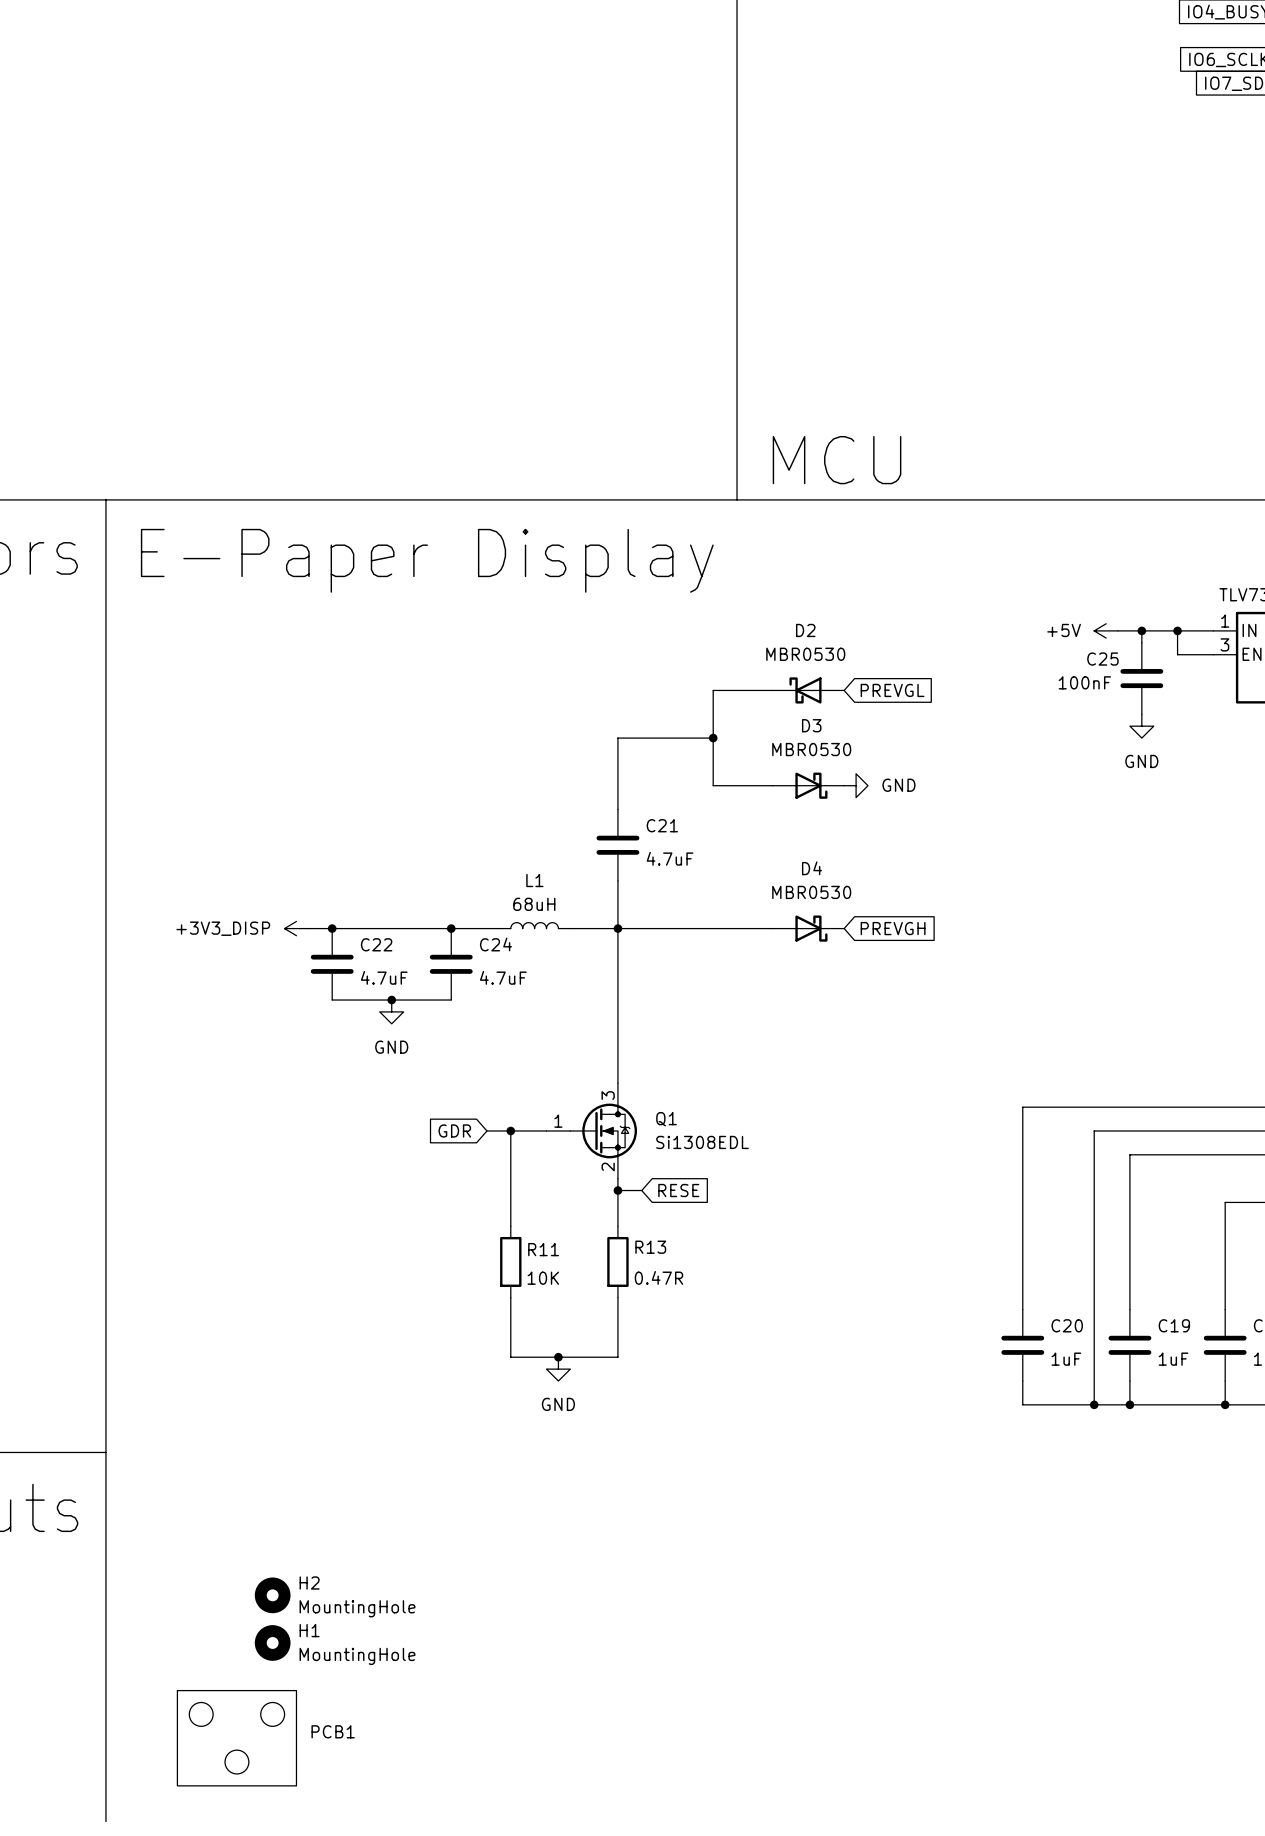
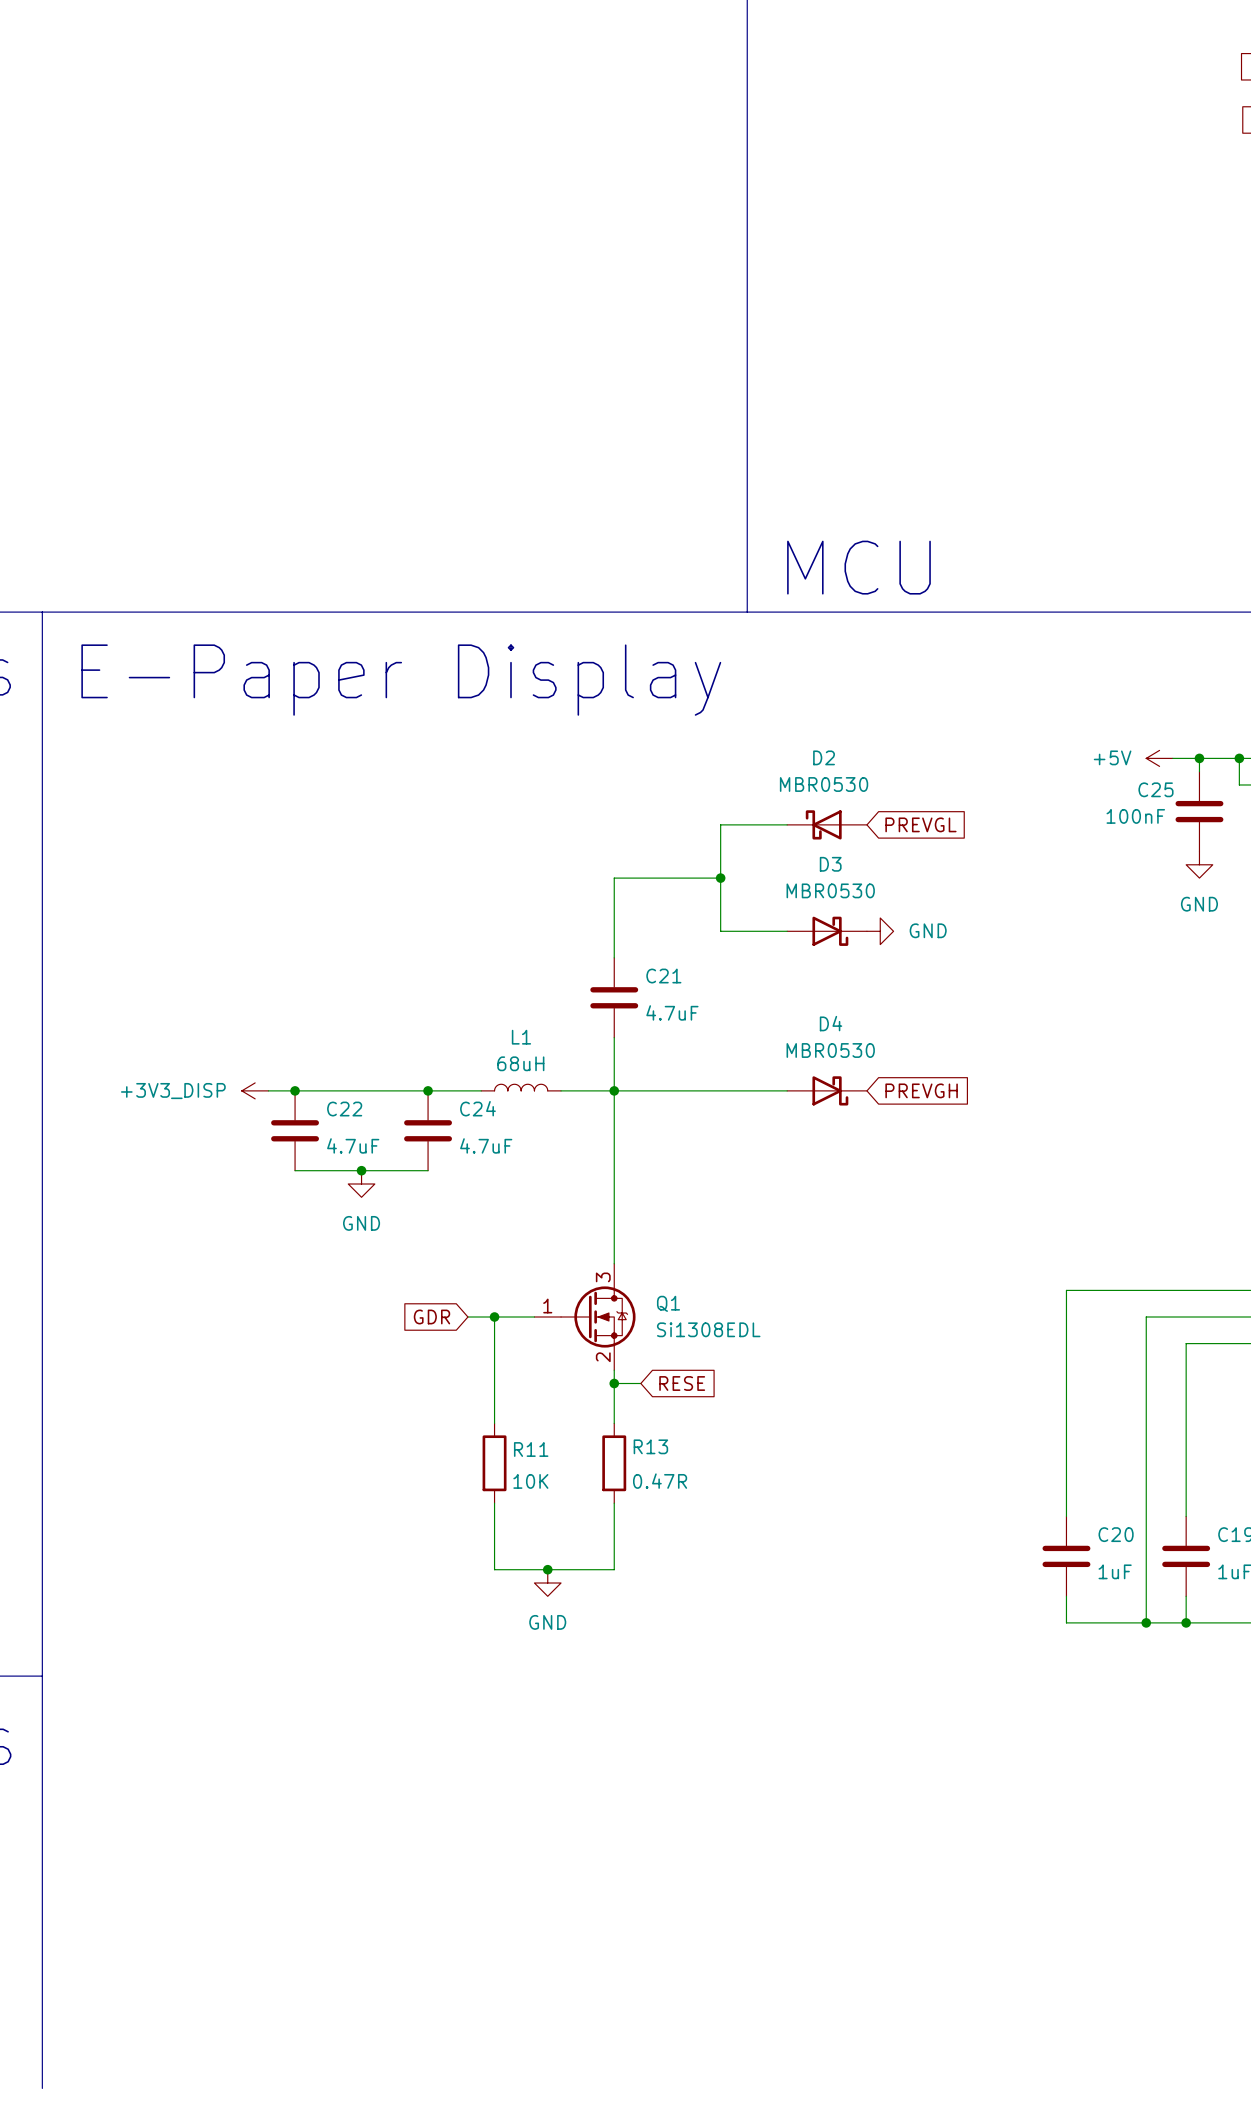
H2: MountingHole (272, 1595) -> none
H1: MountingHole (272, 1642) -> none
PCB1: (236, 1738) -> none

